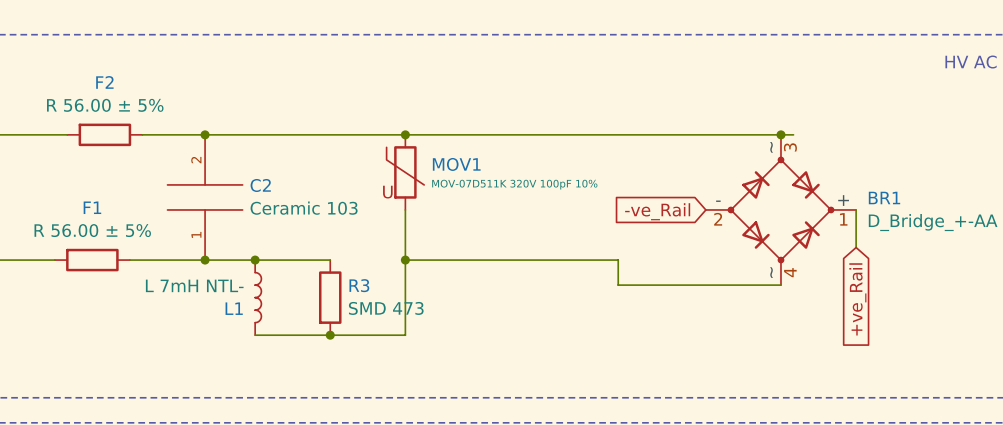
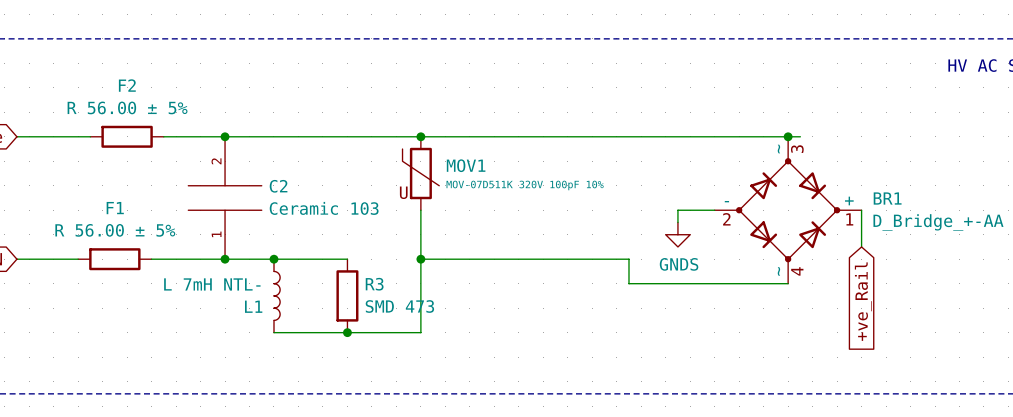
wire: none -> (714, 210) (677, 210) (677, 222)
global label: -ve_Rail (657, 211) -> none
power symbol: none -> GNDS (677, 234)

